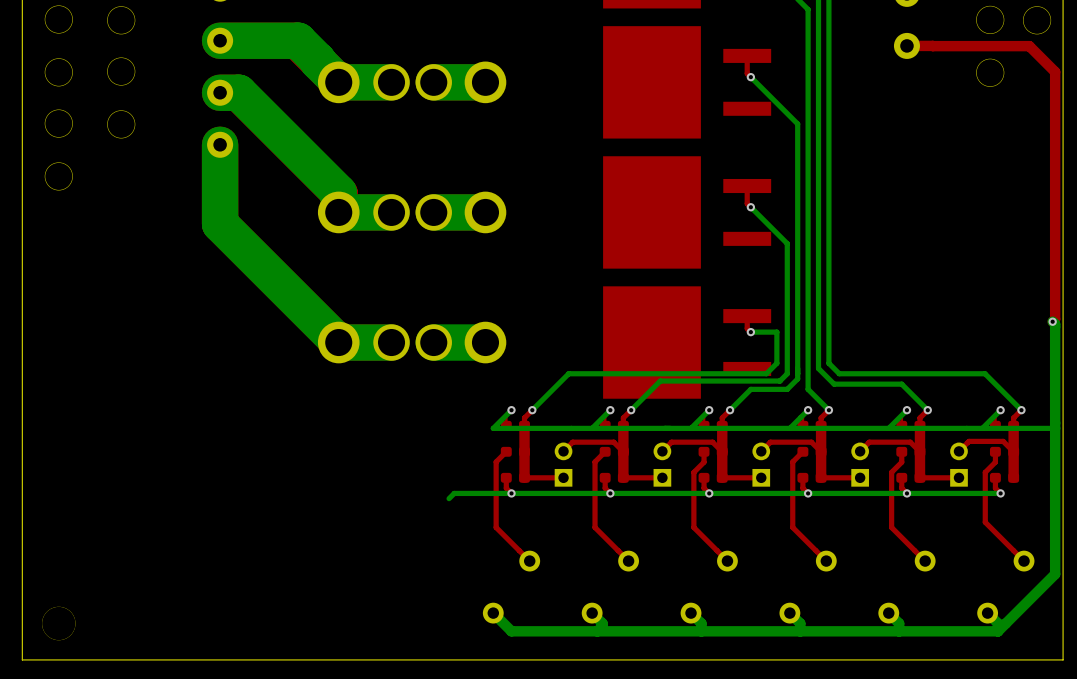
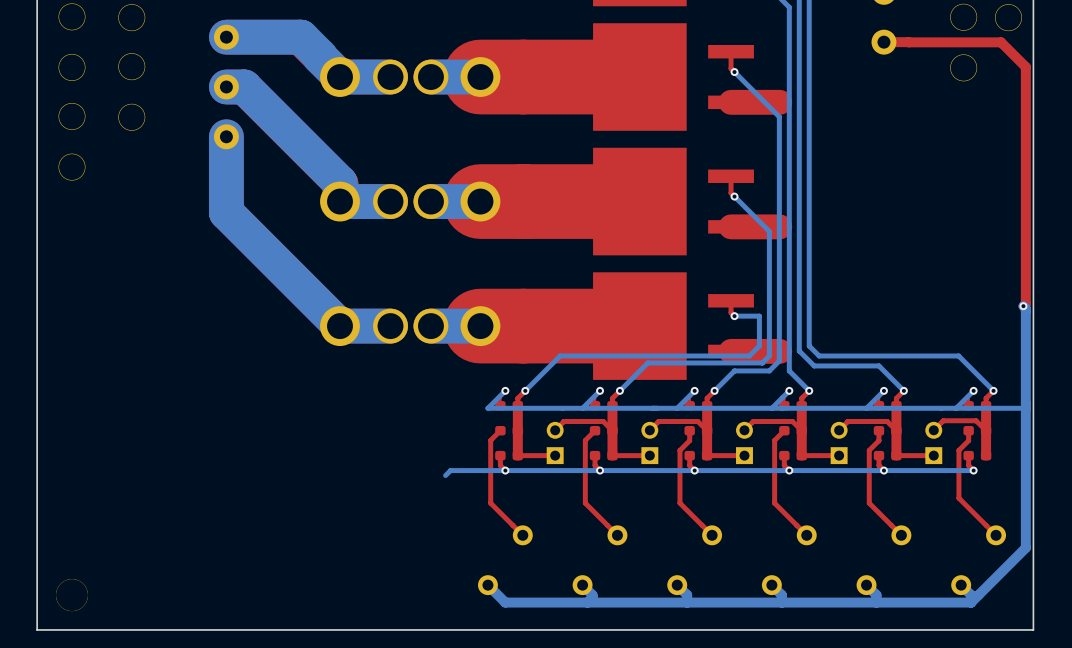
top track: none -> (639, 77) (480, 77)
top track: none -> (779, 102) (731, 102)
top track: none -> (639, 201) (480, 201)
top track: none -> (779, 226) (731, 226)
top track: none -> (639, 326) (430, 326)
top track: none -> (779, 351) (731, 351)

